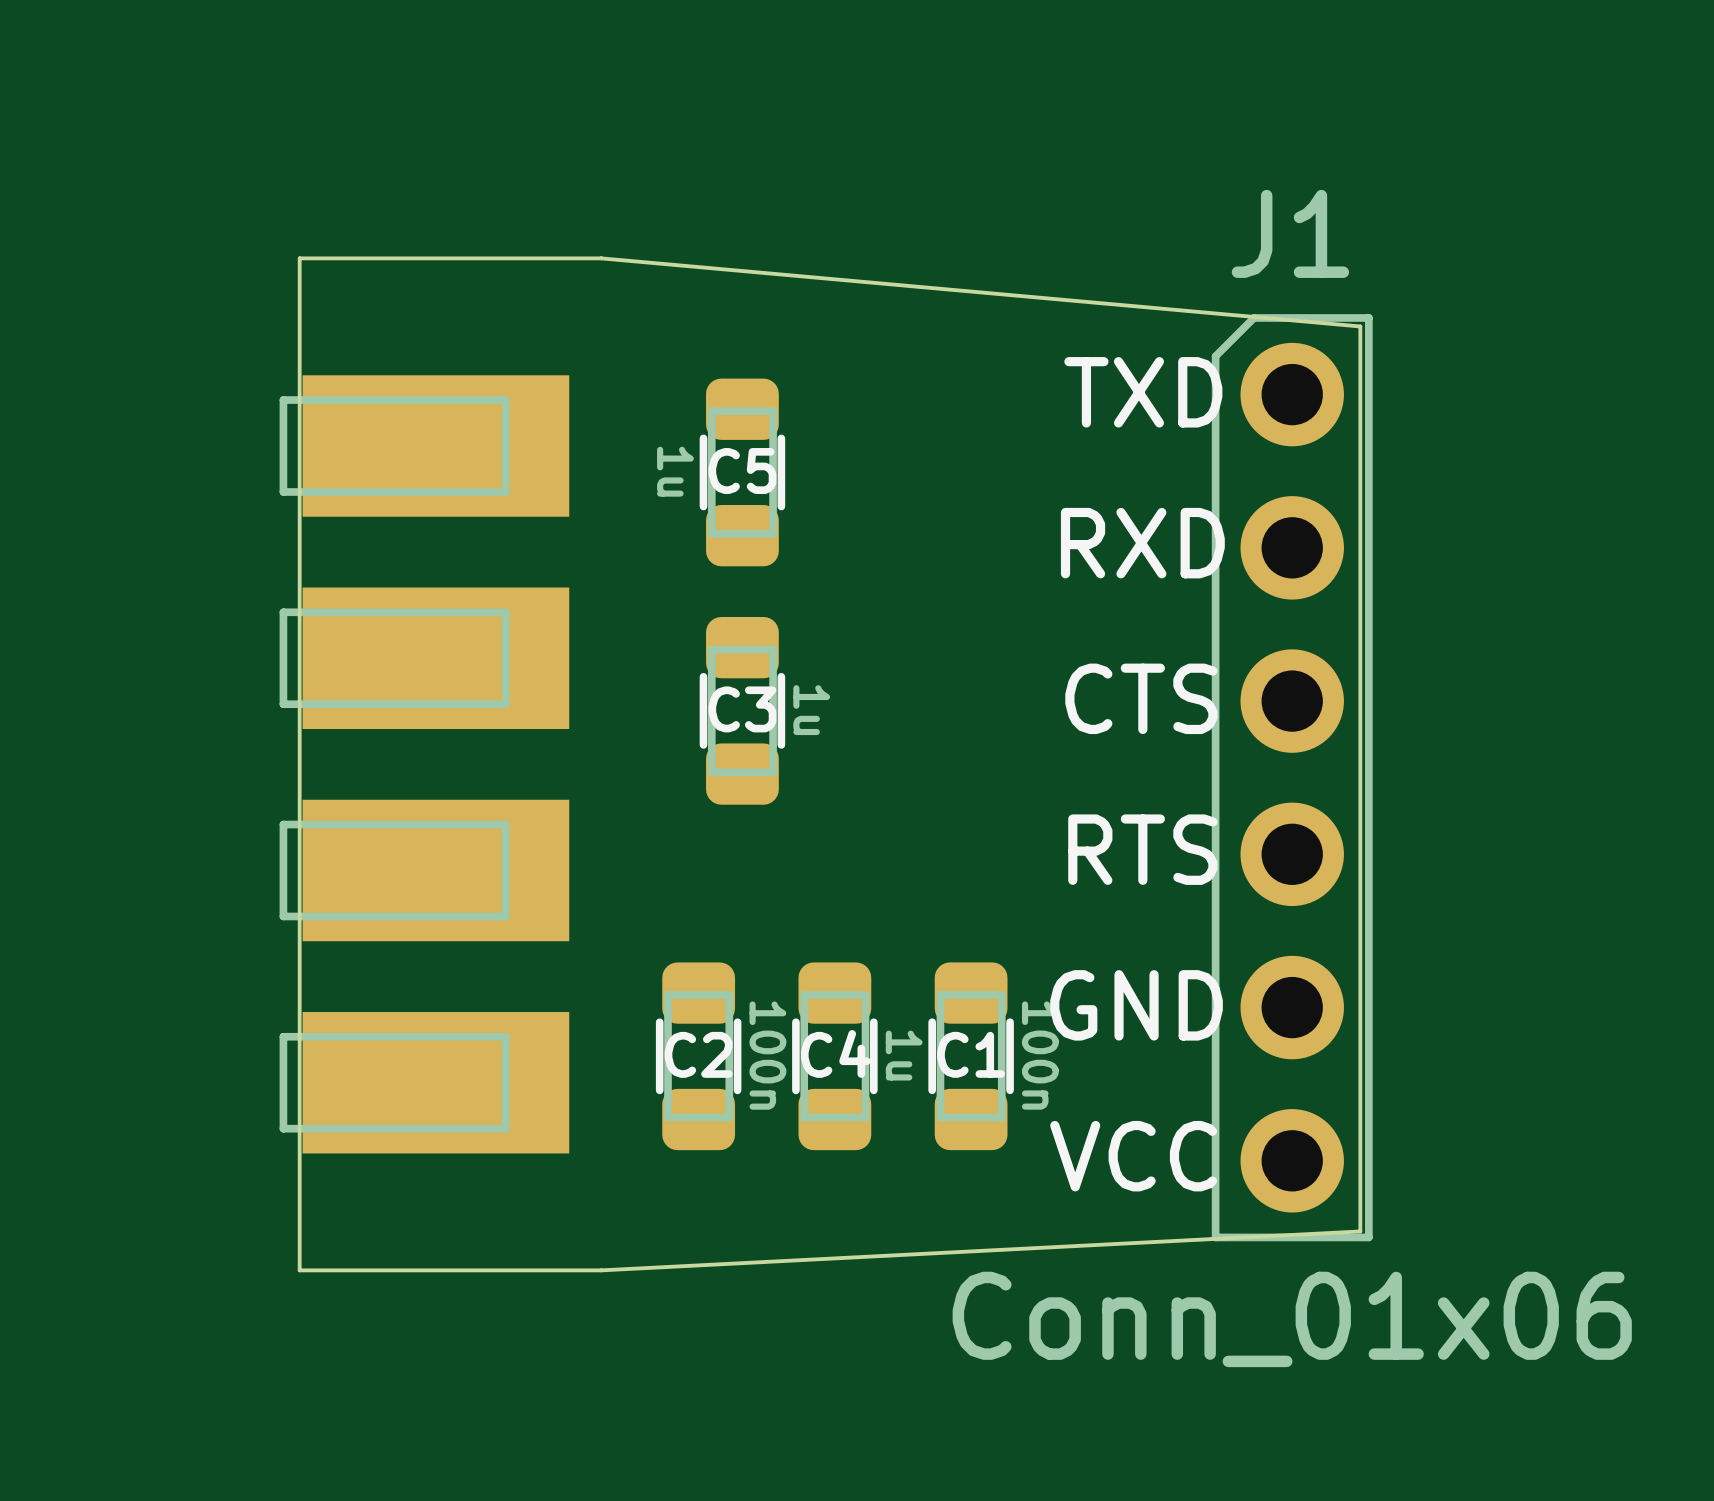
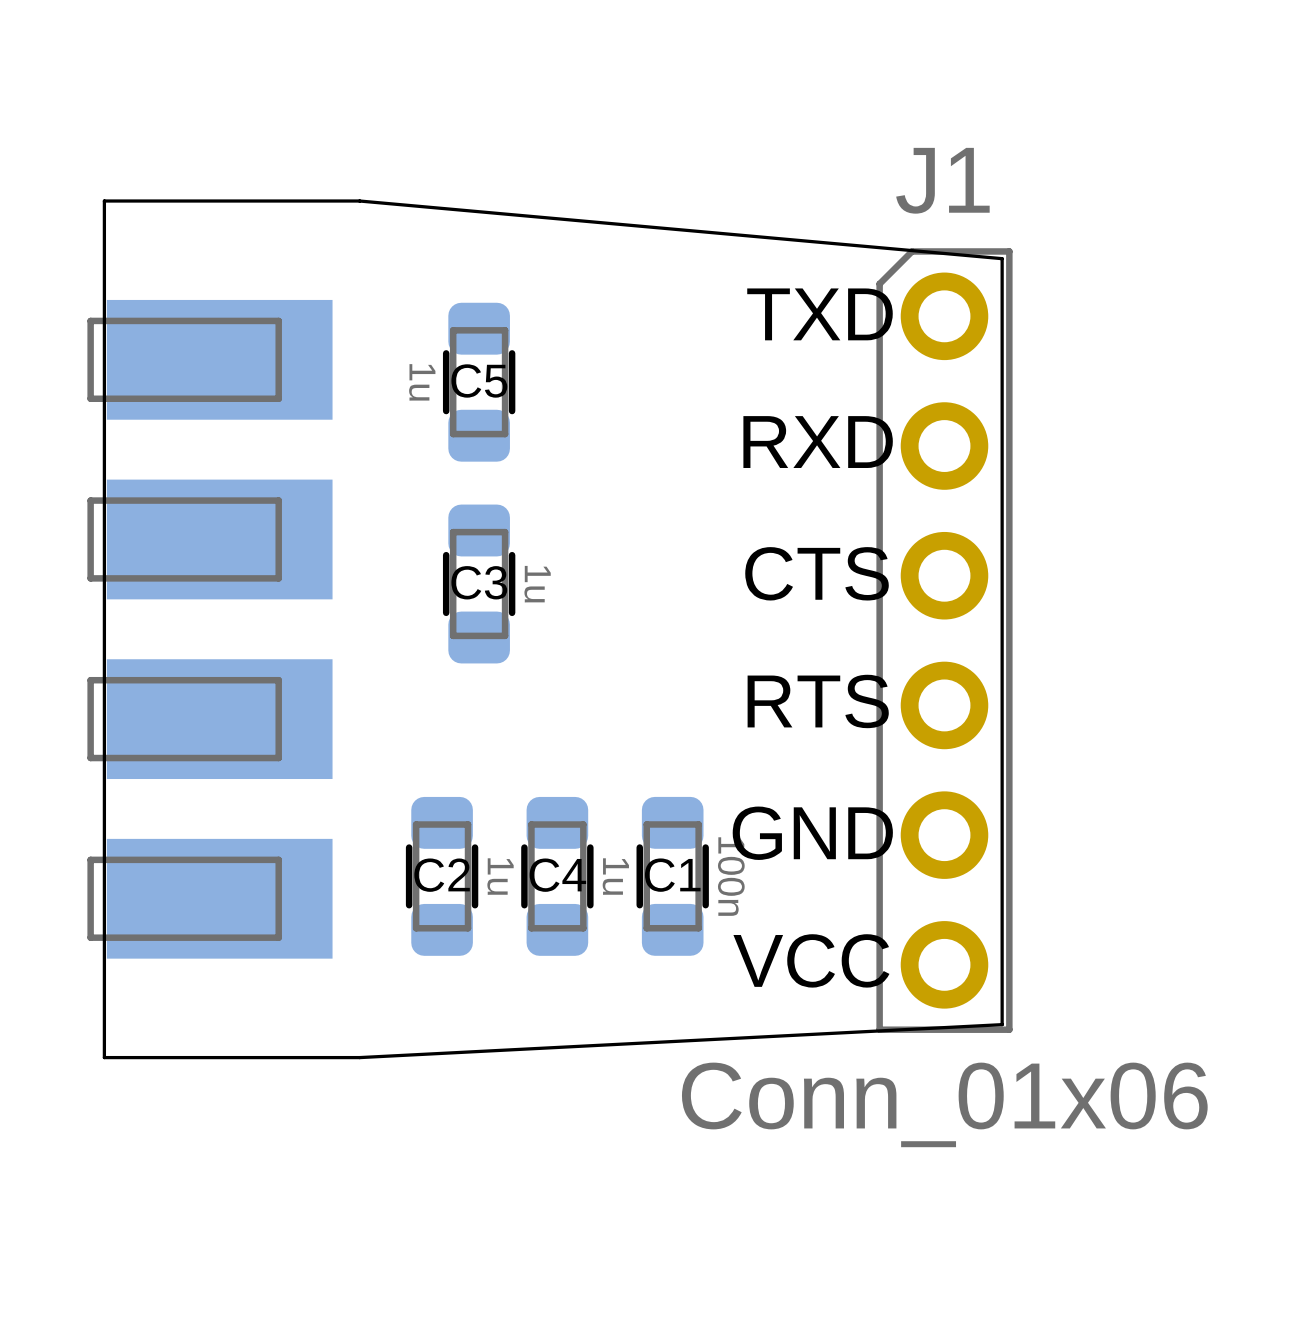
C2 value: 100n (767, 1055) -> 1u (500, 876)

